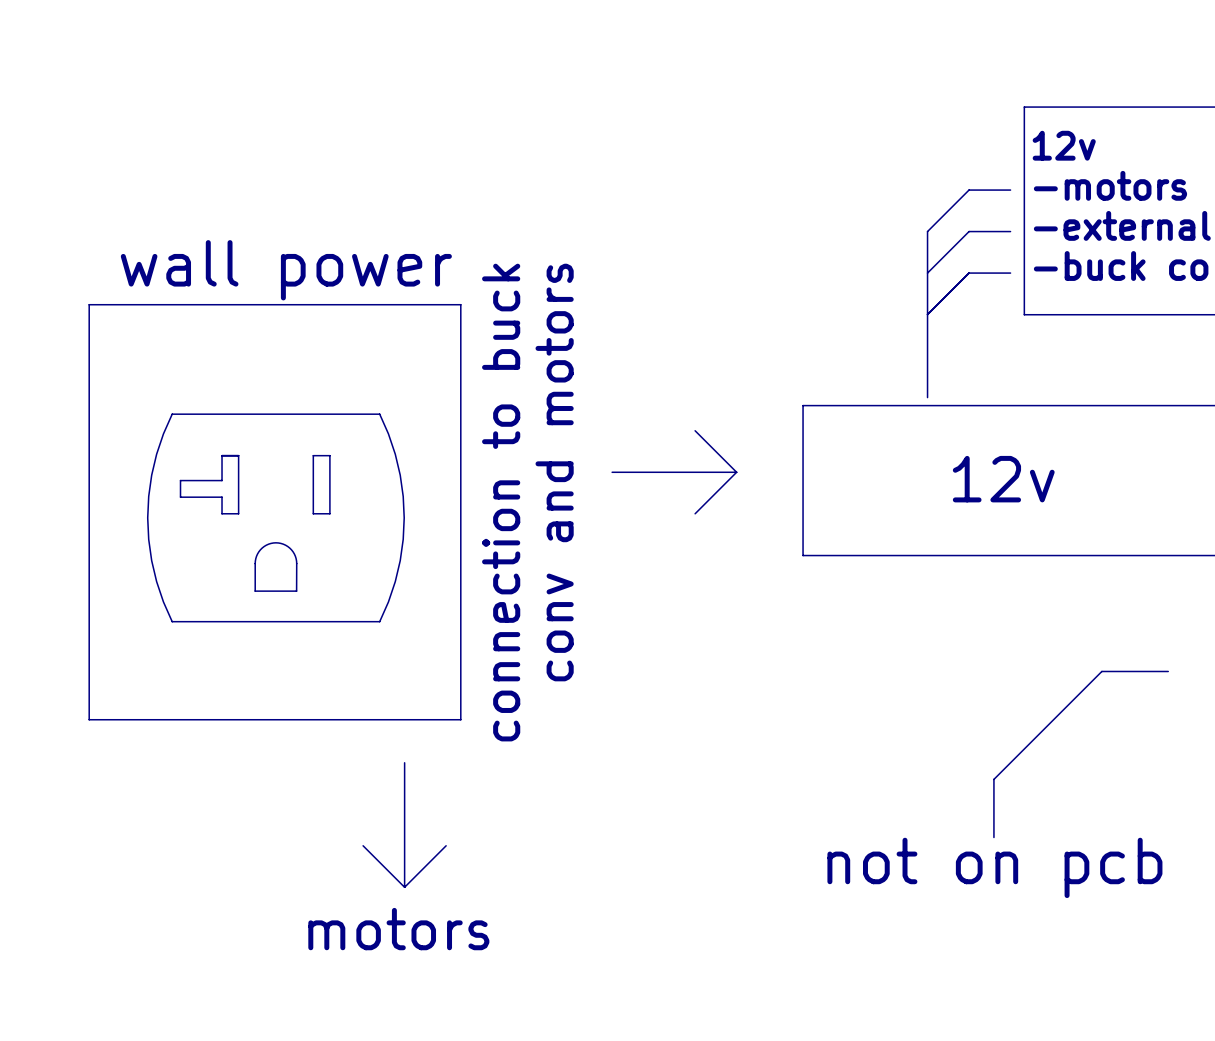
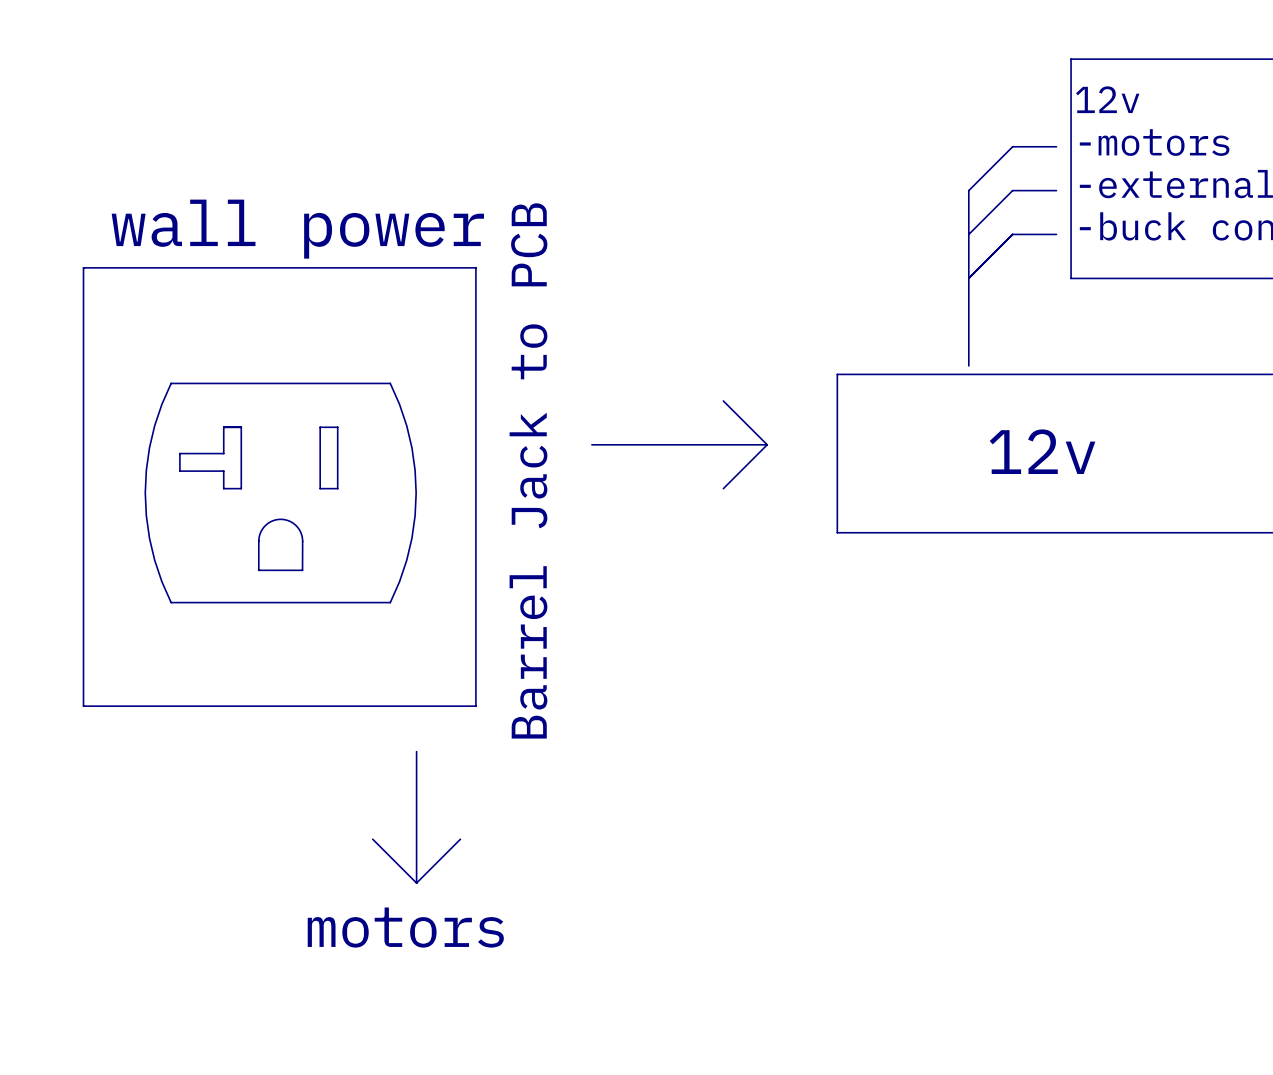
text: conv and motors (554, 472) -> none
line: none -> (591, 444) (635, 444)
text: connection to buck (501, 502) -> none
text: none -> Barrel Jack to PCB (528, 470)
line: (1168, 671) (1101, 671) (993, 779) (993, 837) -> none
text: not on pcb (994, 867) -> none

